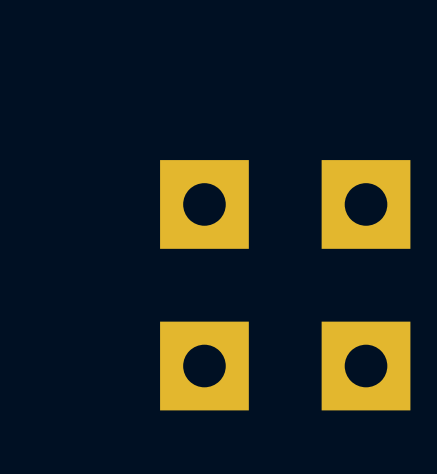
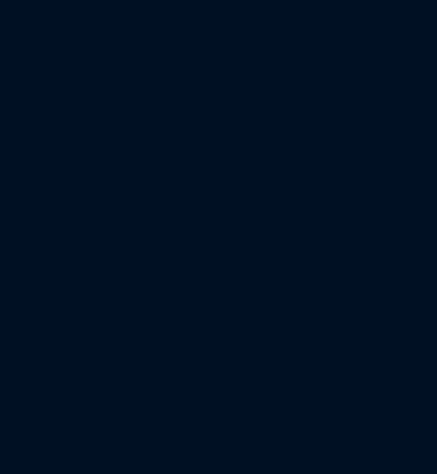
part: (204, 204) -> none
part: (366, 204) -> none
part: (204, 366) -> none
part: (366, 366) -> none

